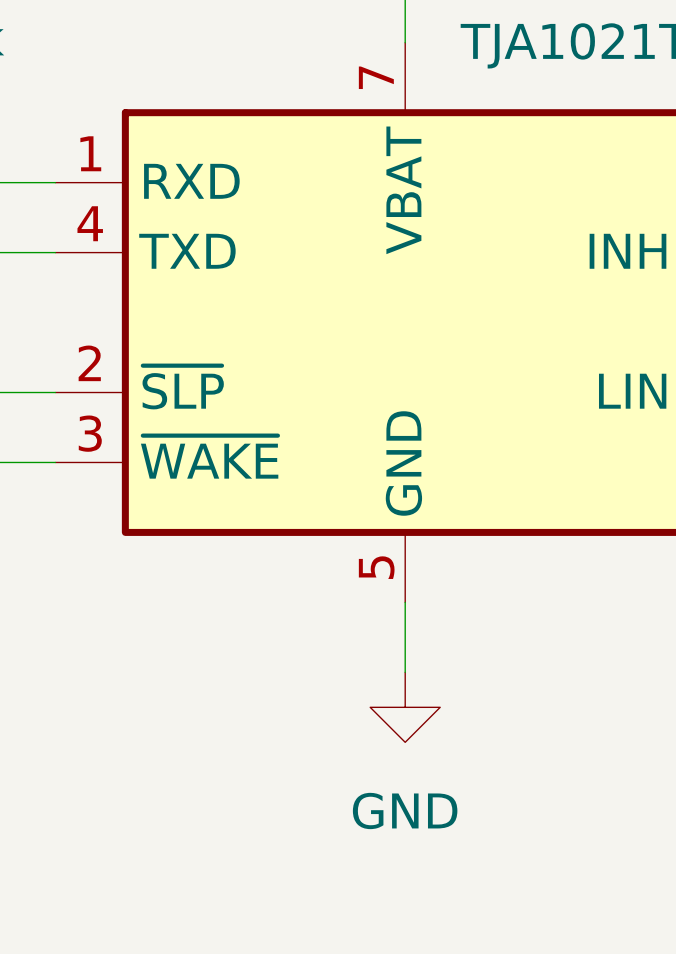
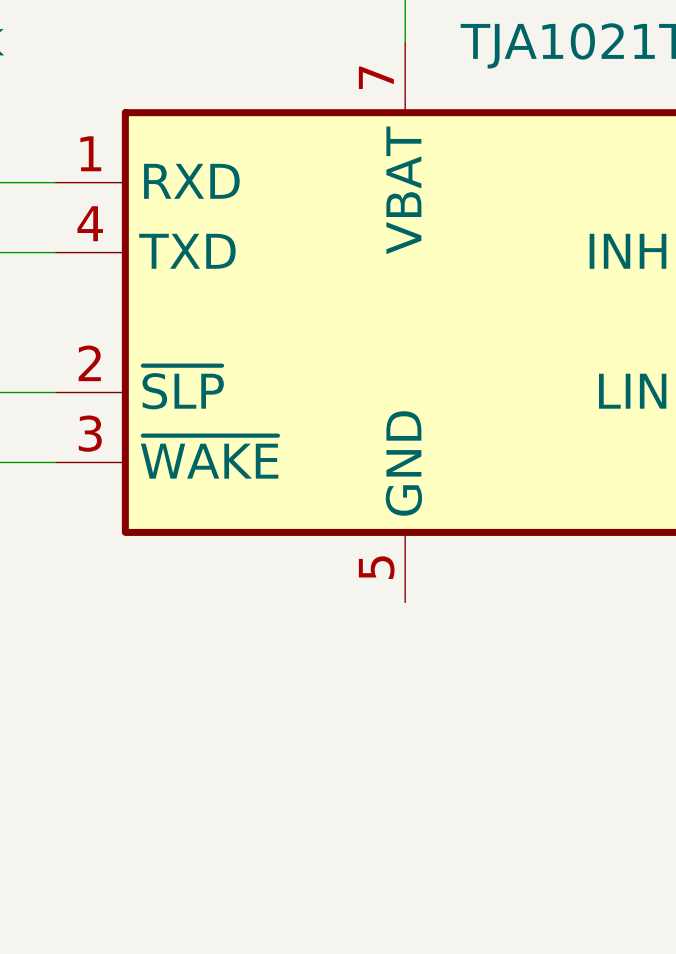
wire: (405, 602) (405, 672) -> none
power symbol: GND (405, 707) -> none

